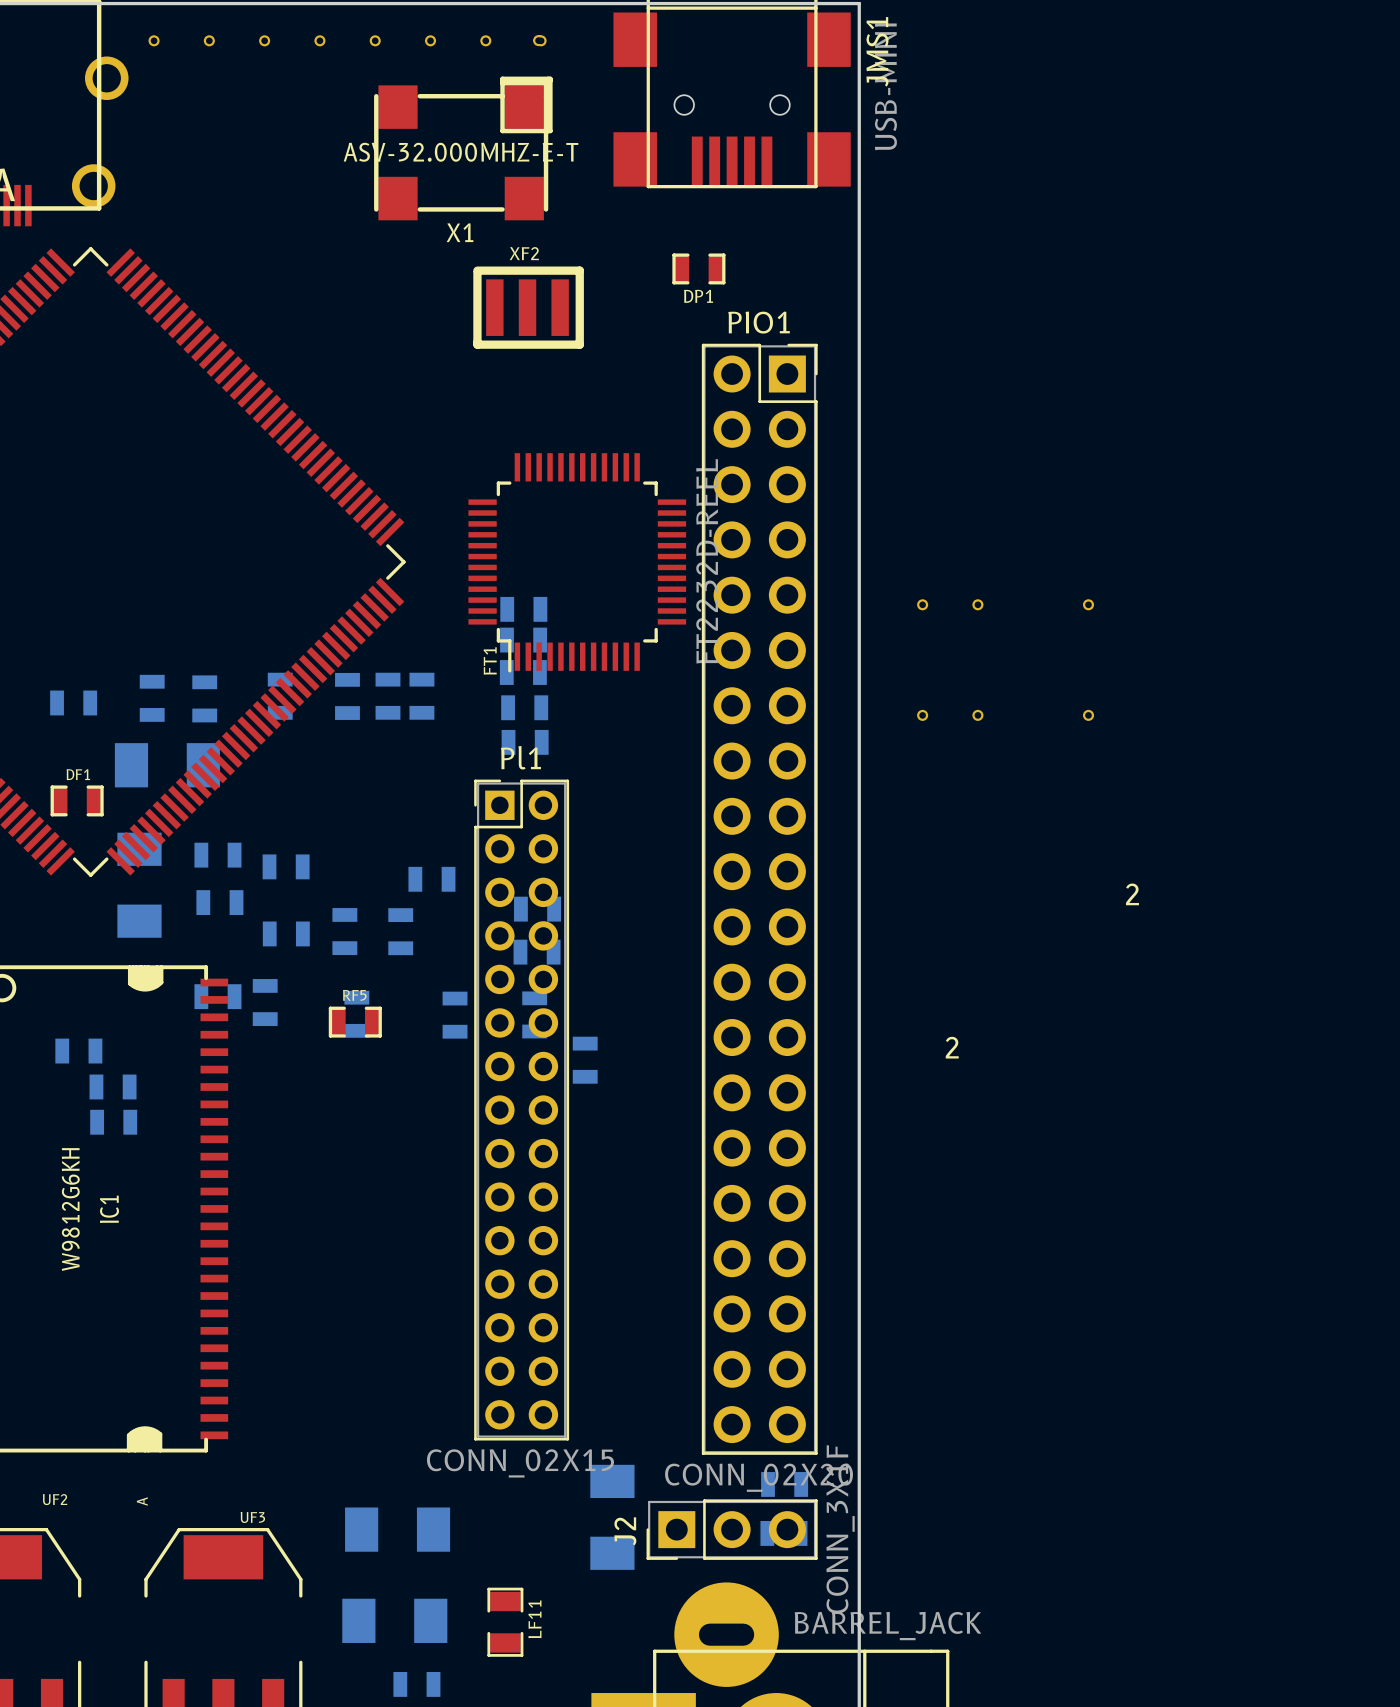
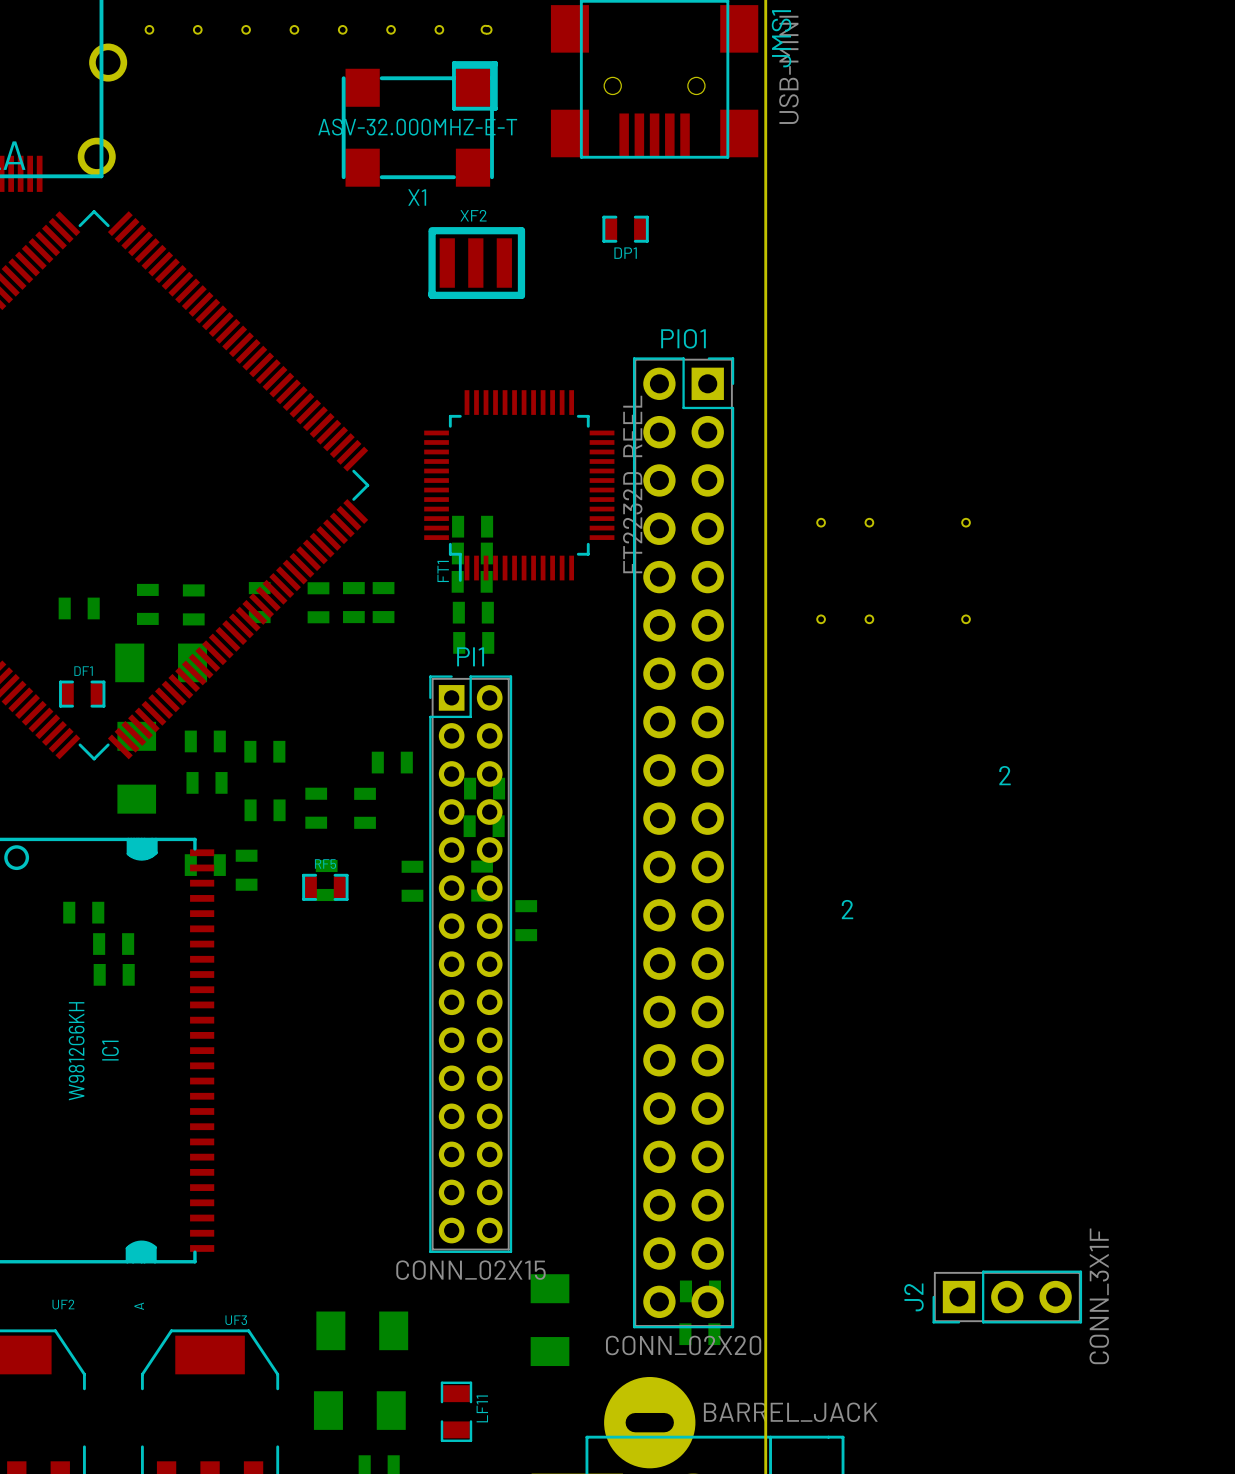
PIO1 position: (759, 899) -> (683, 842)
J2 position: (732, 1529) -> (1007, 1297)

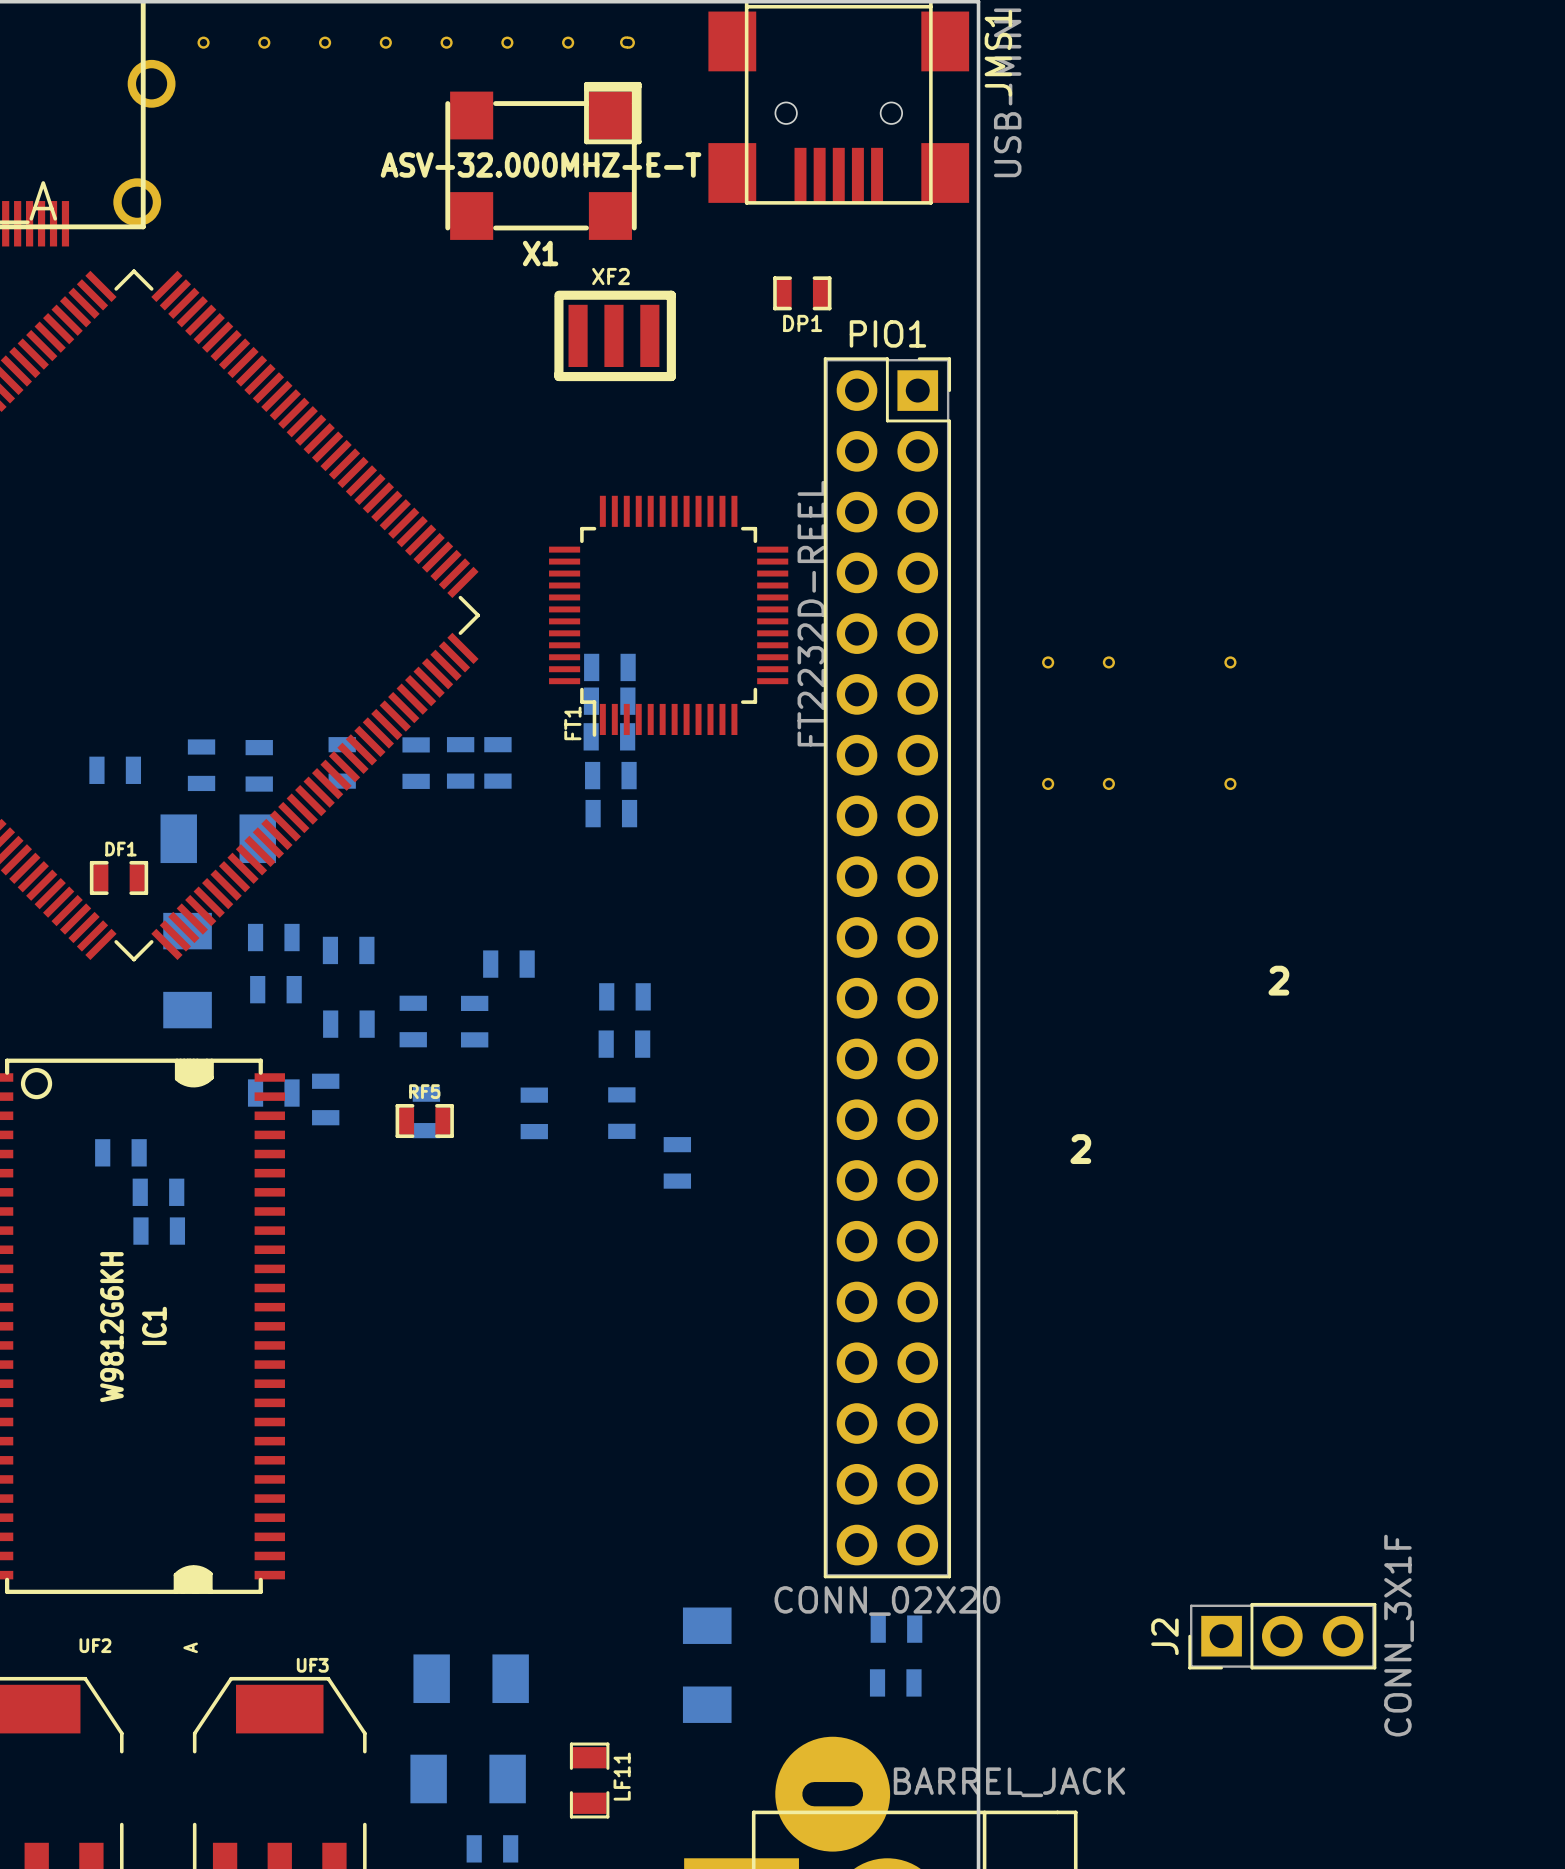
PIO1 position: (683, 842) -> (887, 967)
Pl1: CONN_02X15 (470, 964) -> none

